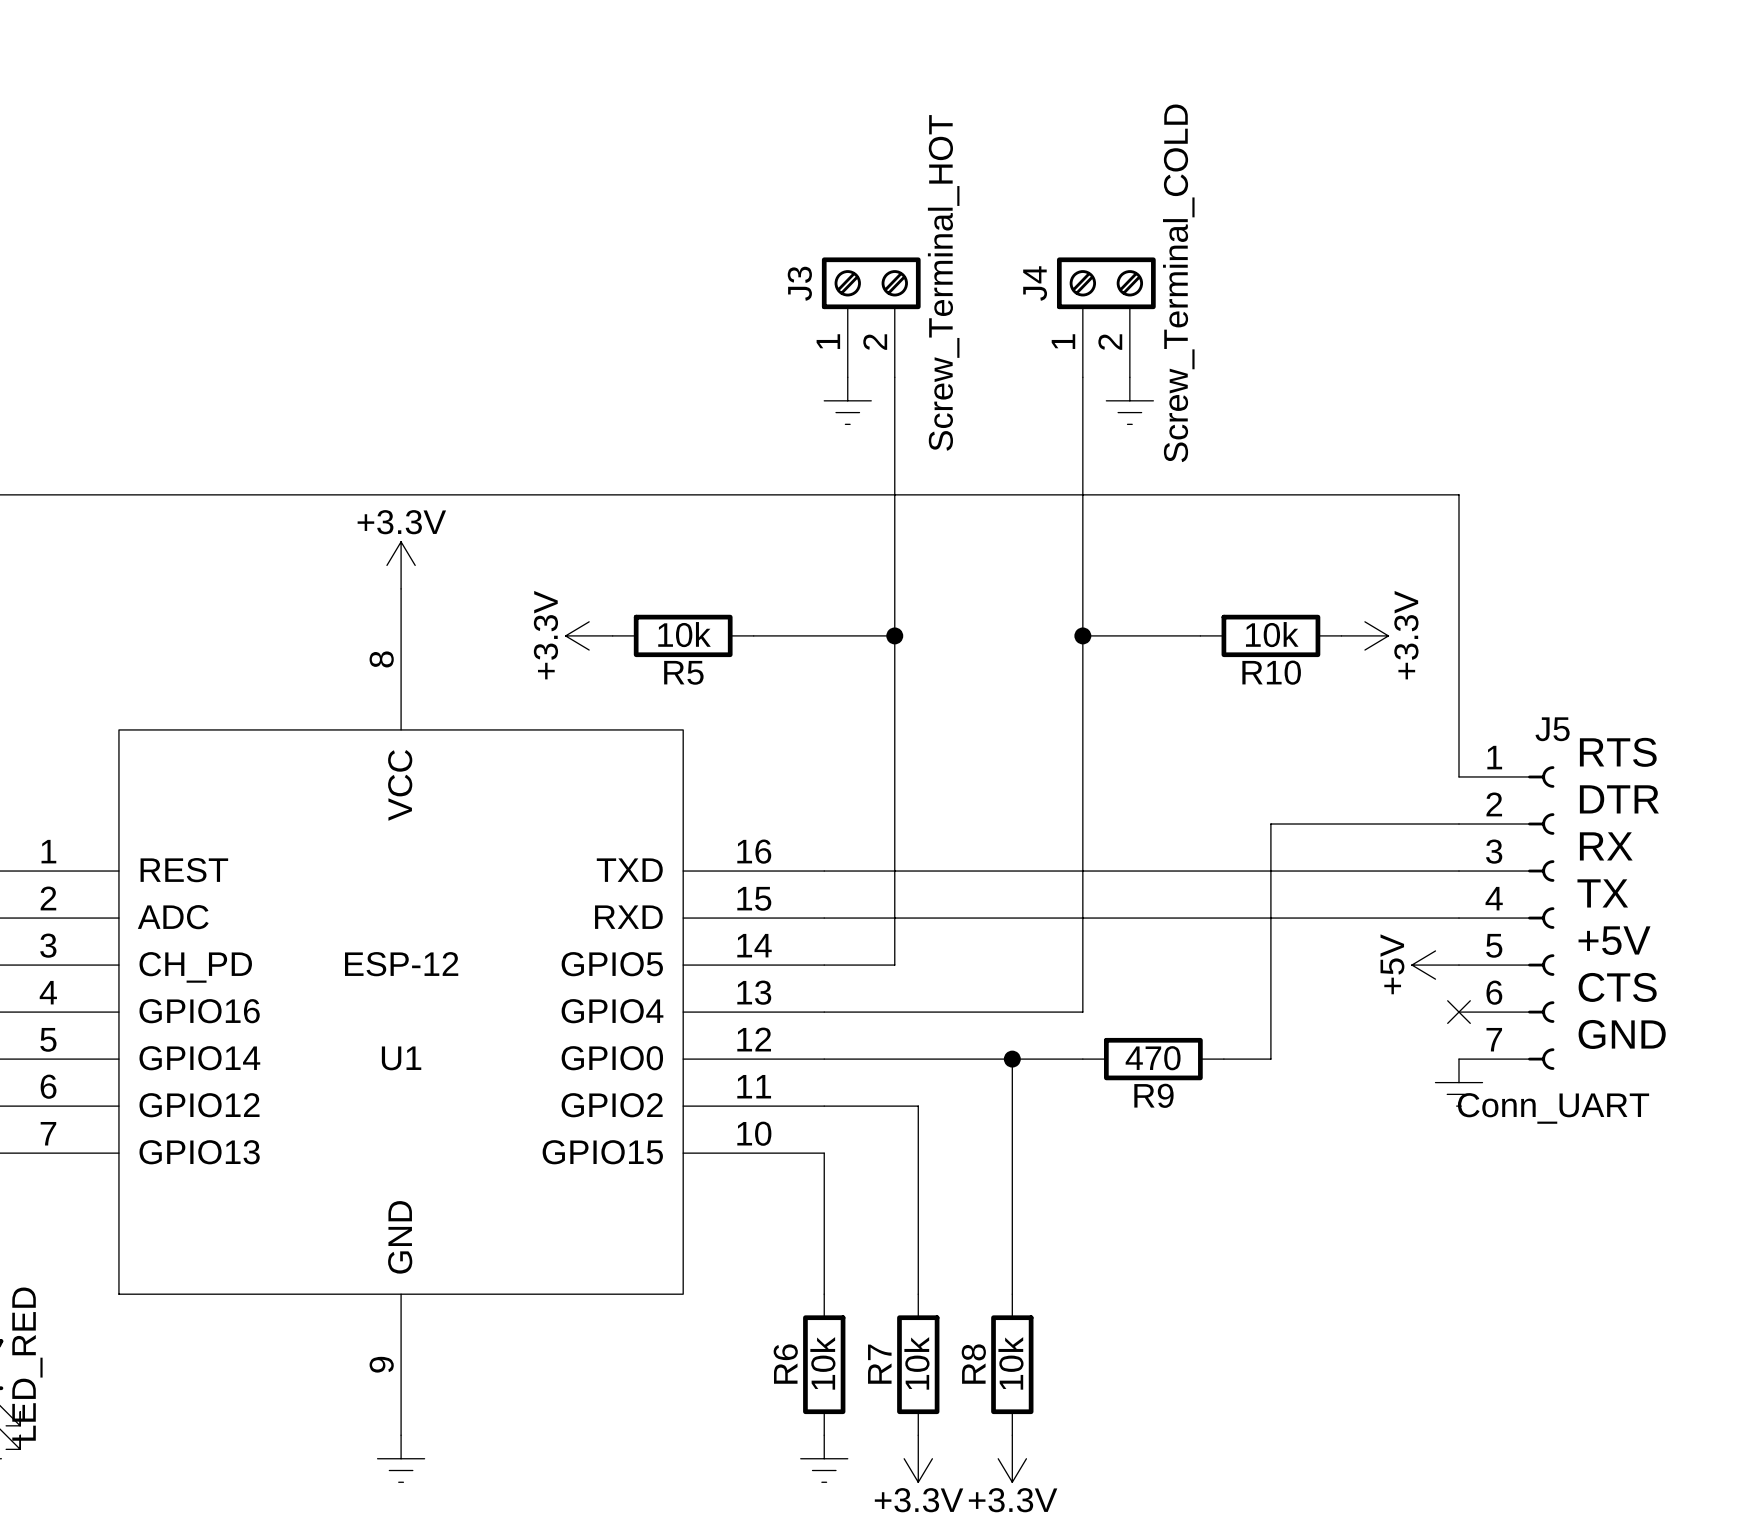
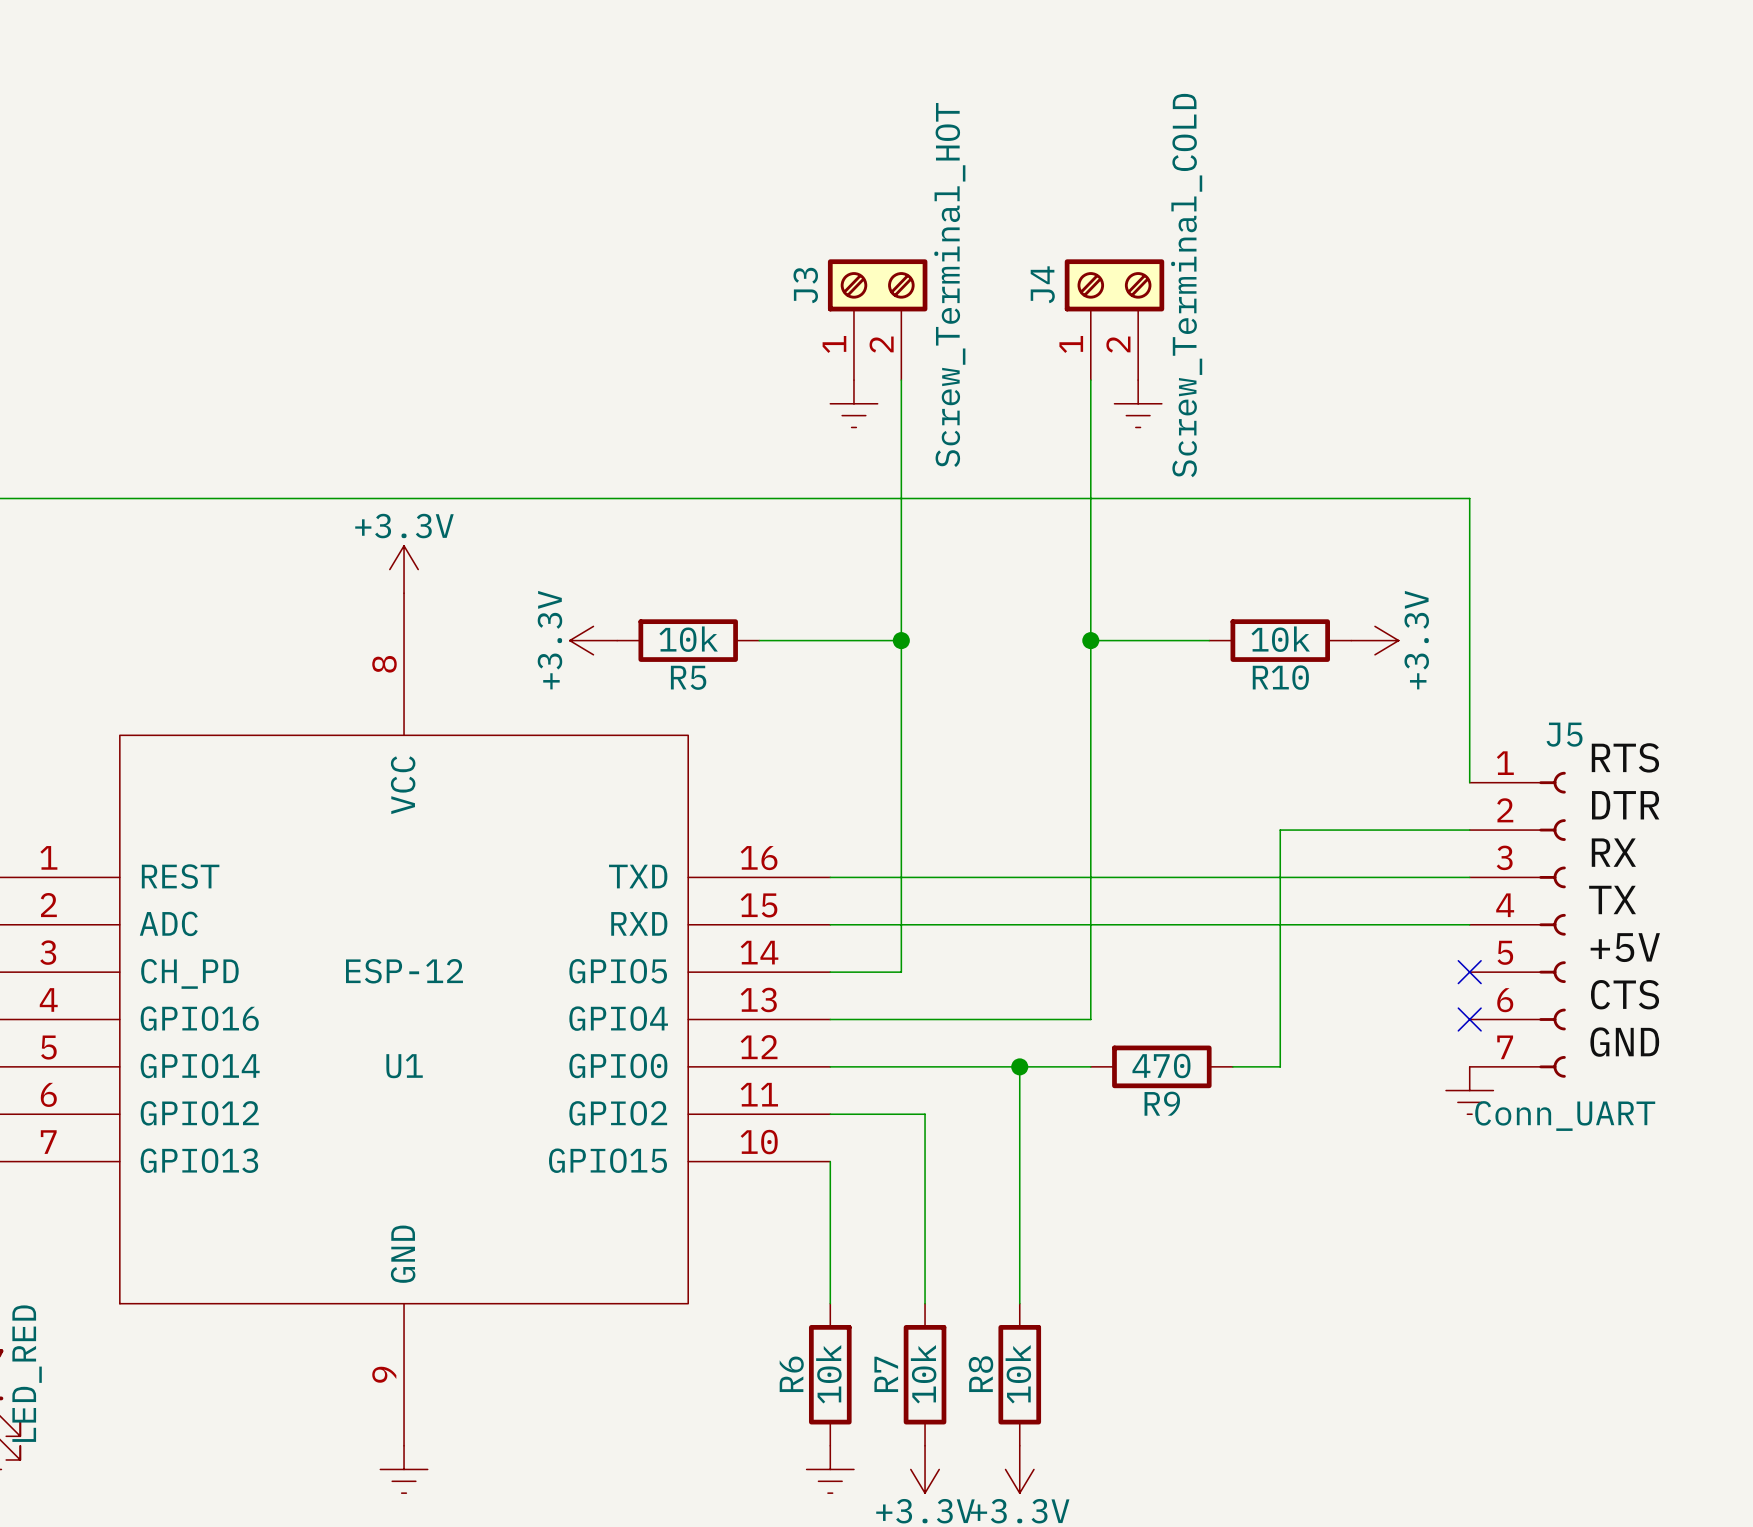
power symbol: +5V (1435, 965) -> none
no-connect mark: none -> (1469, 972)

